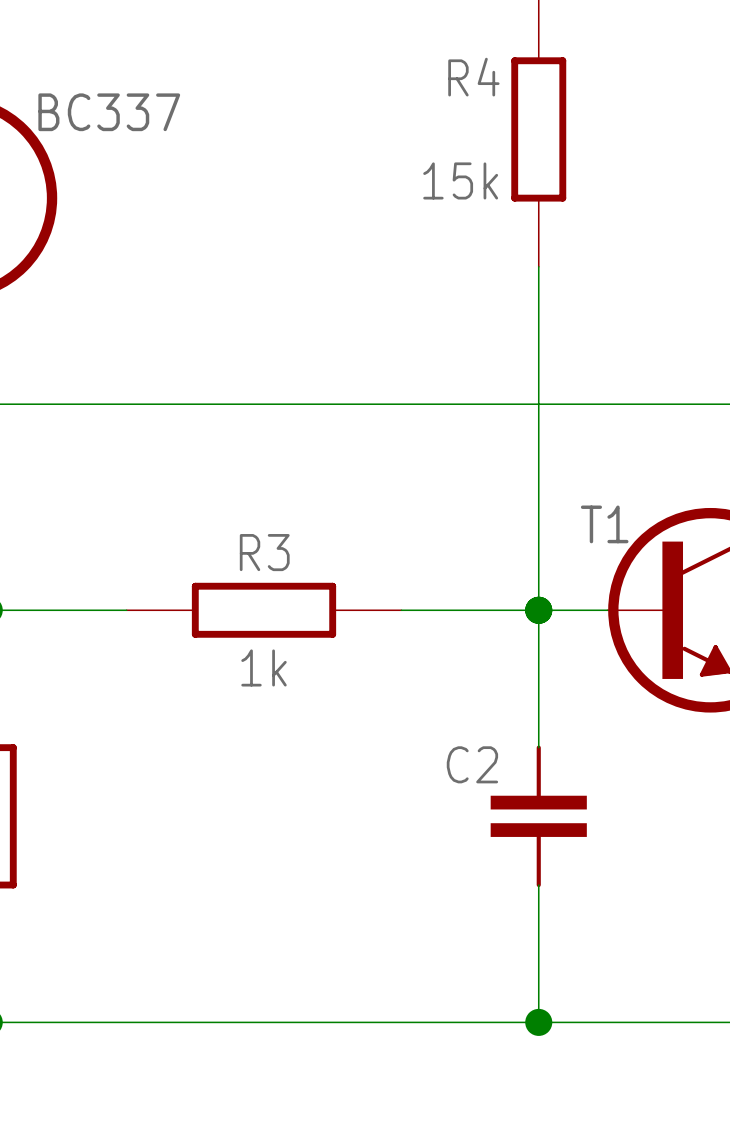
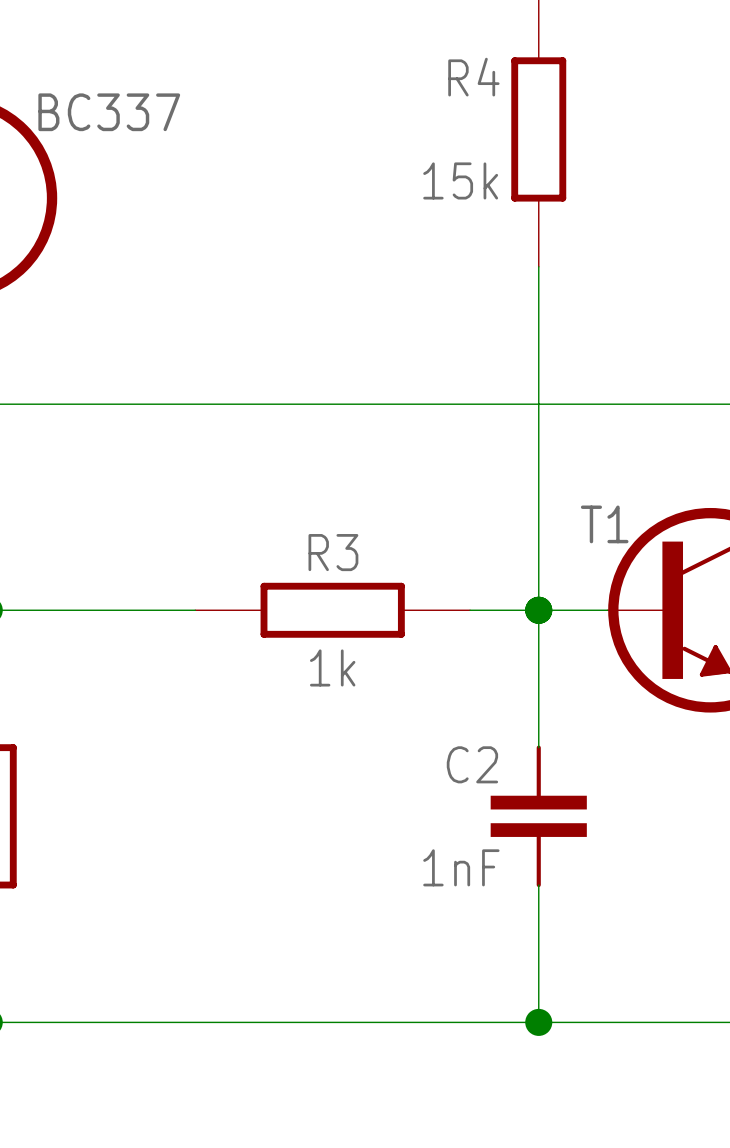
R3 position: (264, 610) -> (332, 610)
C2 value: none -> 1nF (461, 867)

